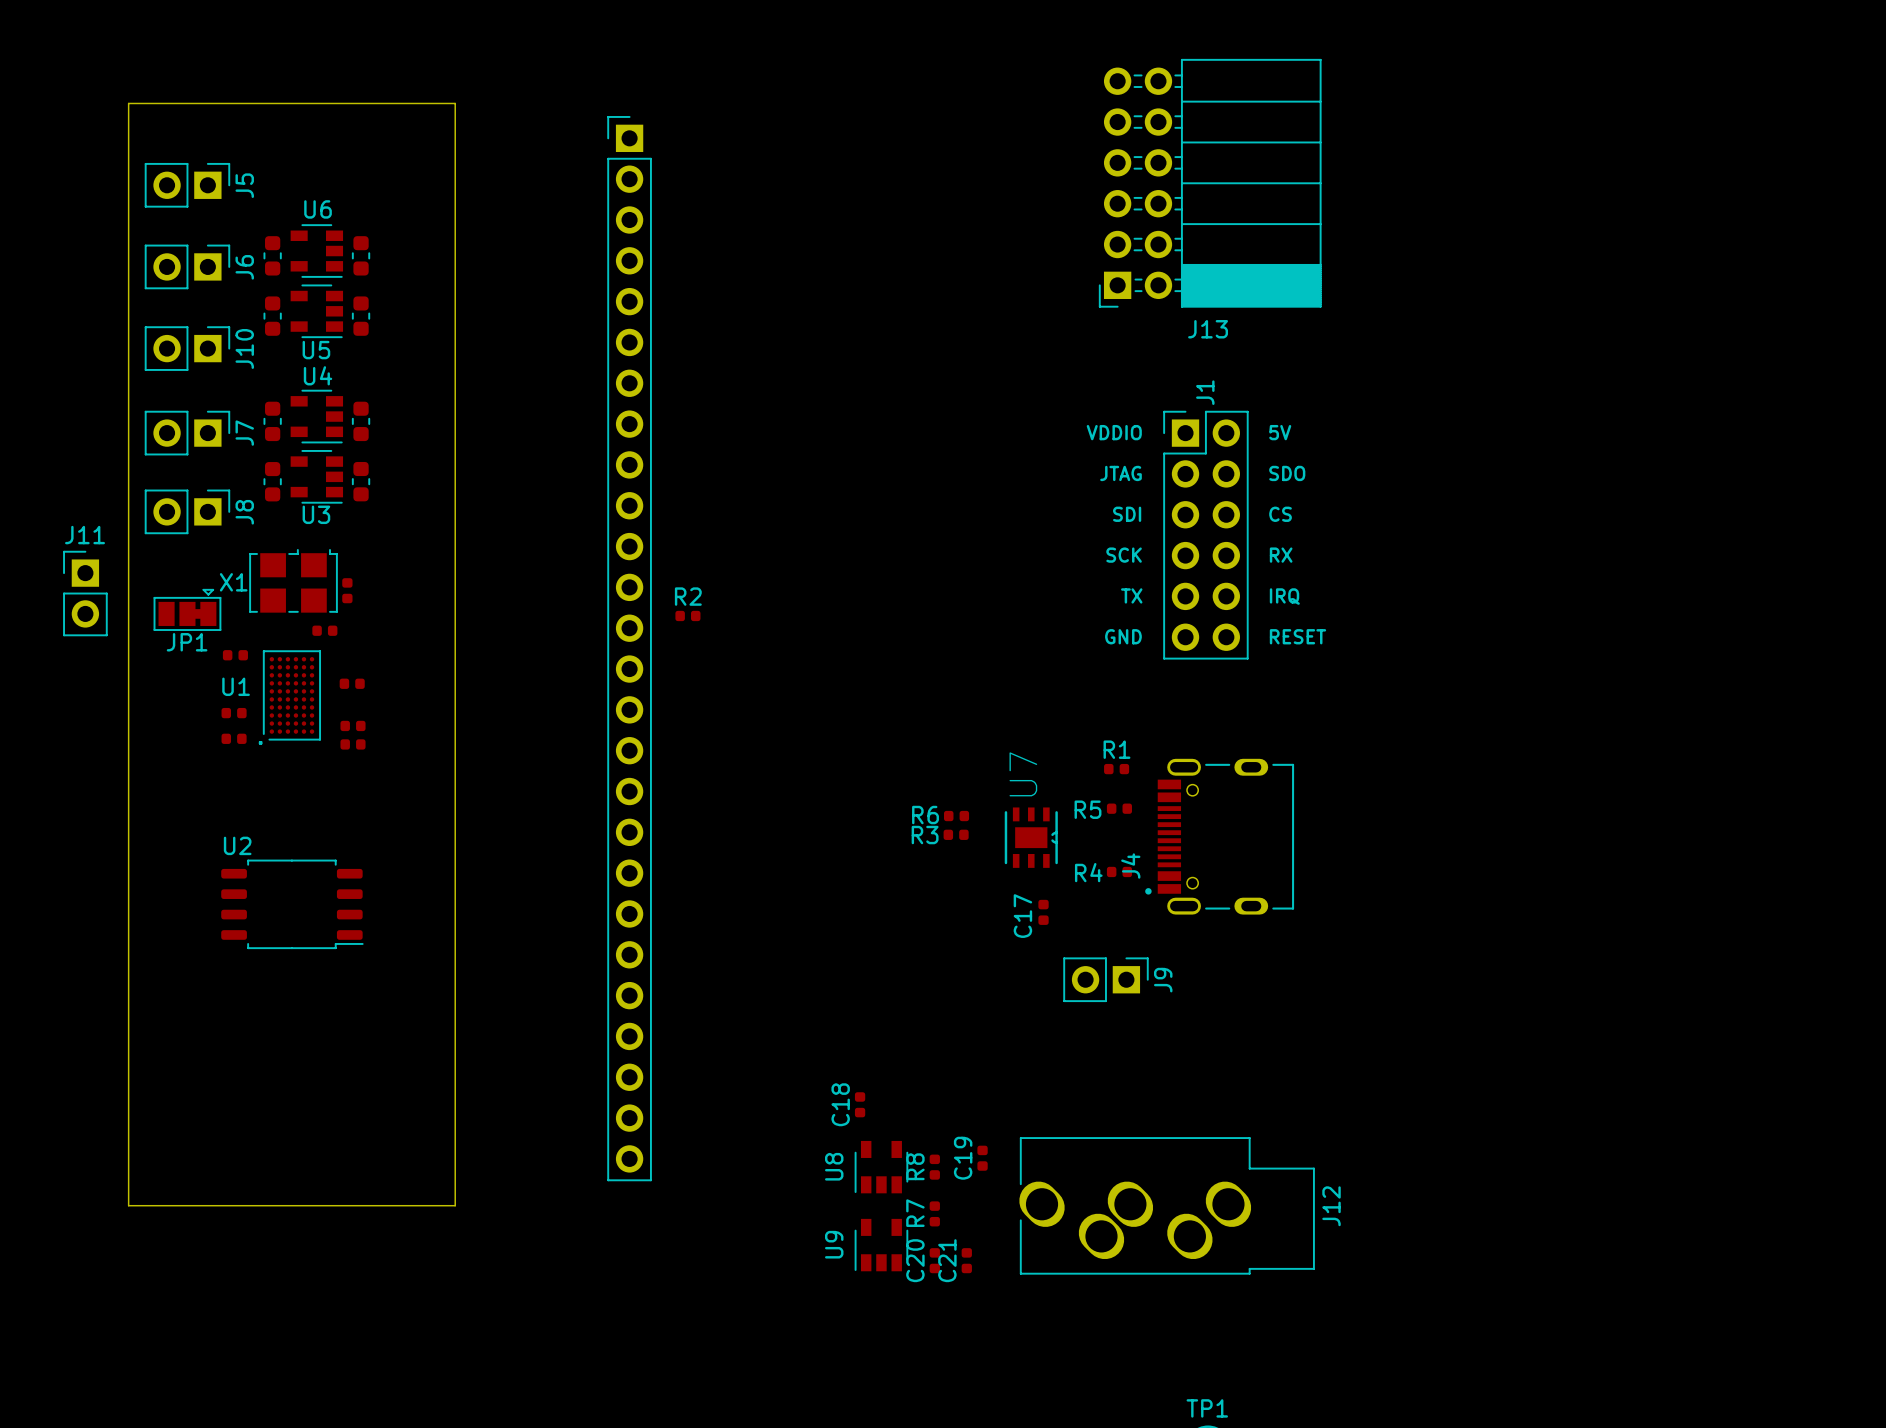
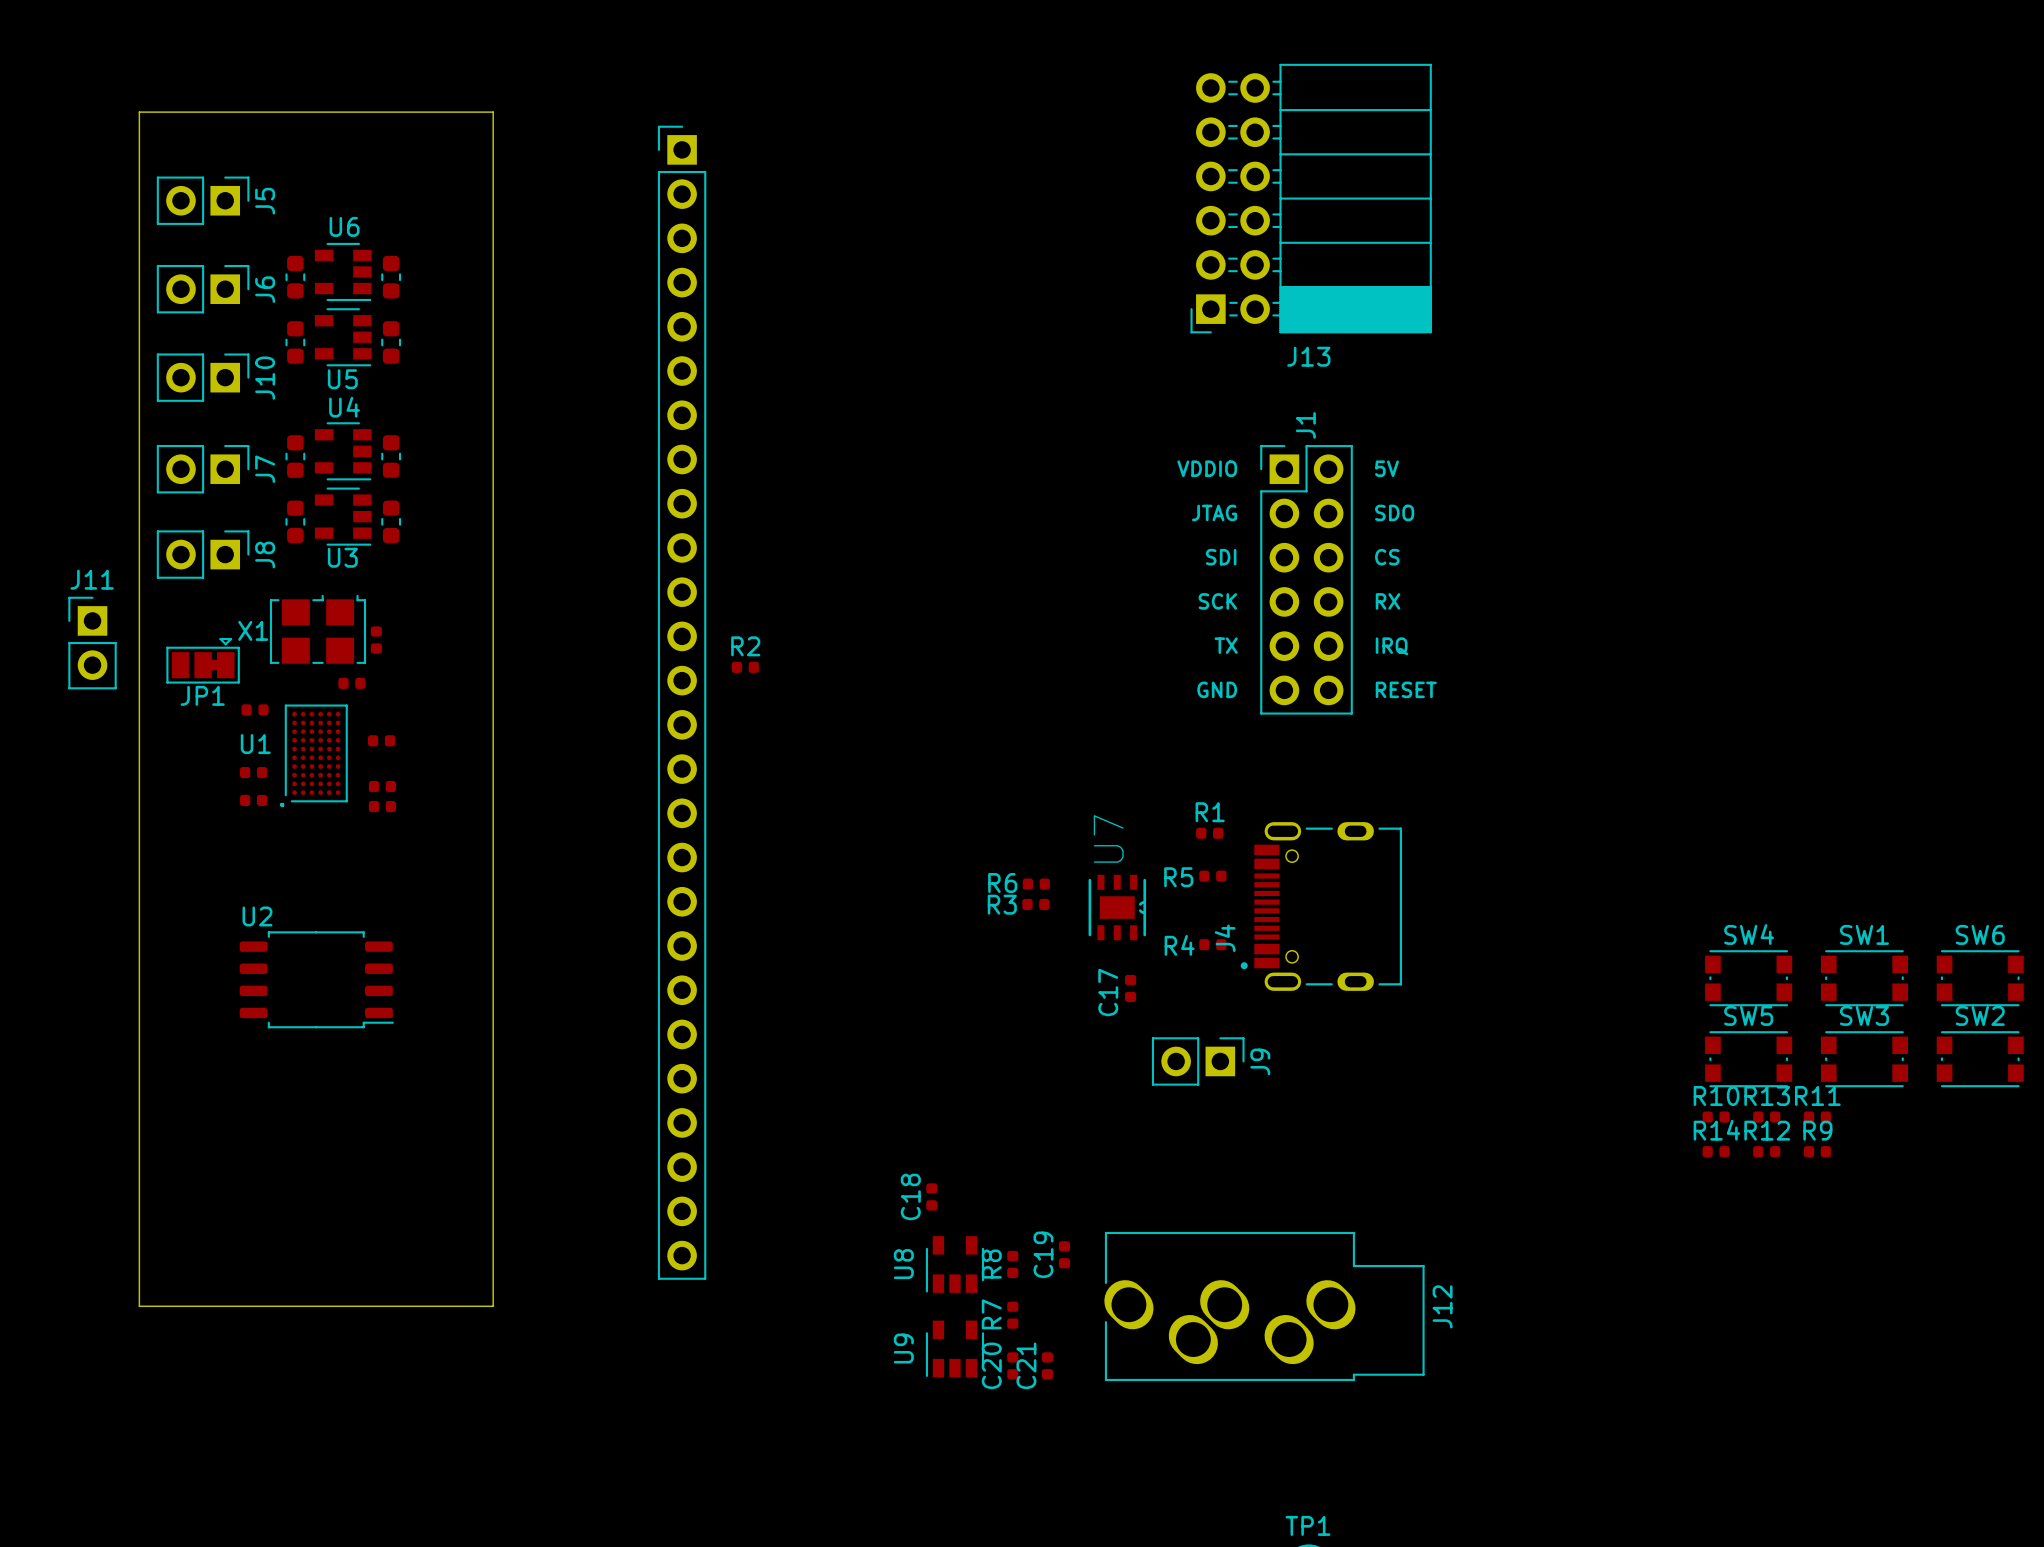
SW4: none -> (1748, 978)
SW1: none -> (1864, 978)
SW6: none -> (1980, 978)
SW5: none -> (1748, 1059)
SW3: none -> (1864, 1059)
SW2: none -> (1980, 1059)
R10: none -> (1716, 1117)
R13: none -> (1766, 1117)
R11: none -> (1817, 1117)
R14: none -> (1716, 1151)
R12: none -> (1766, 1151)
R9: none -> (1817, 1151)

